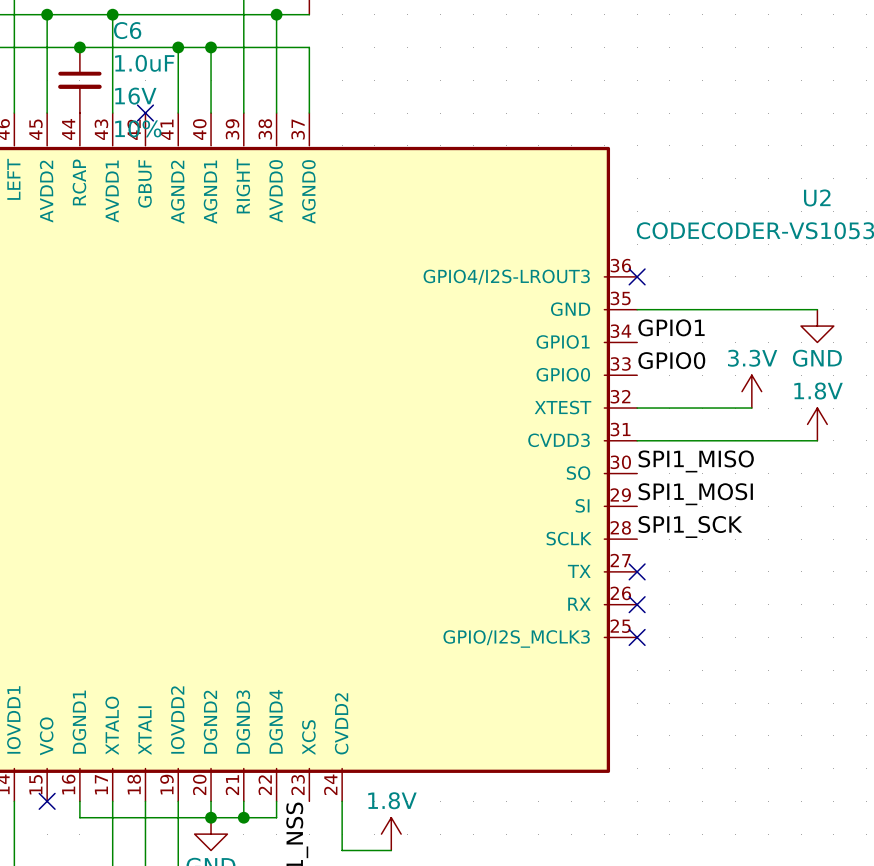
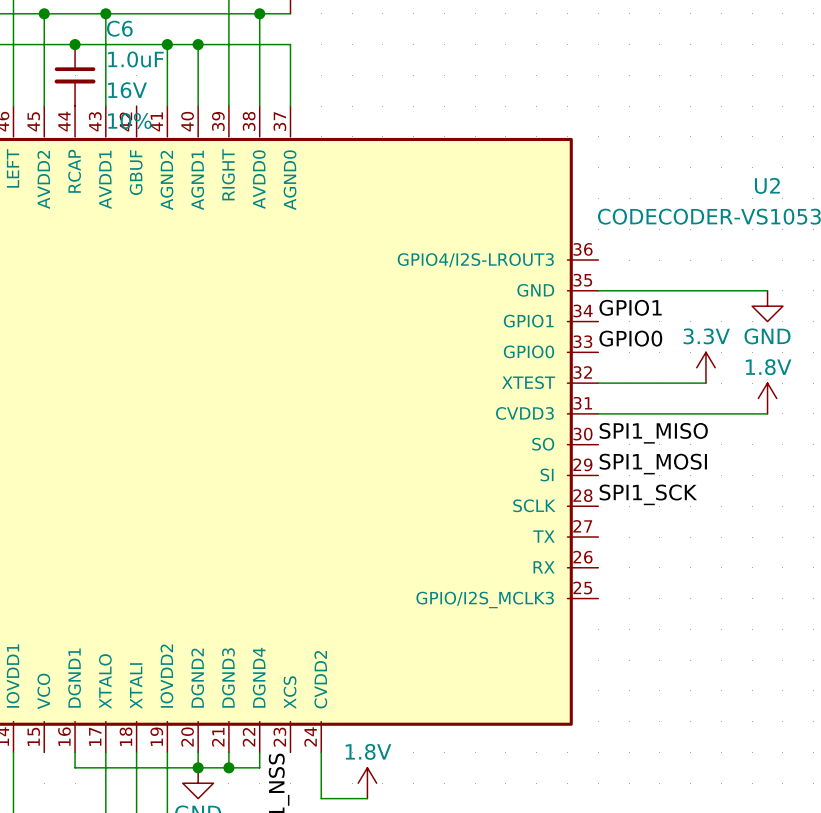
no-connect mark: (145, 113) -> none
no-connect mark: (637, 276) -> none
no-connect mark: (637, 571) -> none
no-connect mark: (637, 604) -> none
no-connect mark: (637, 637) -> none
no-connect mark: (47, 801) -> none

